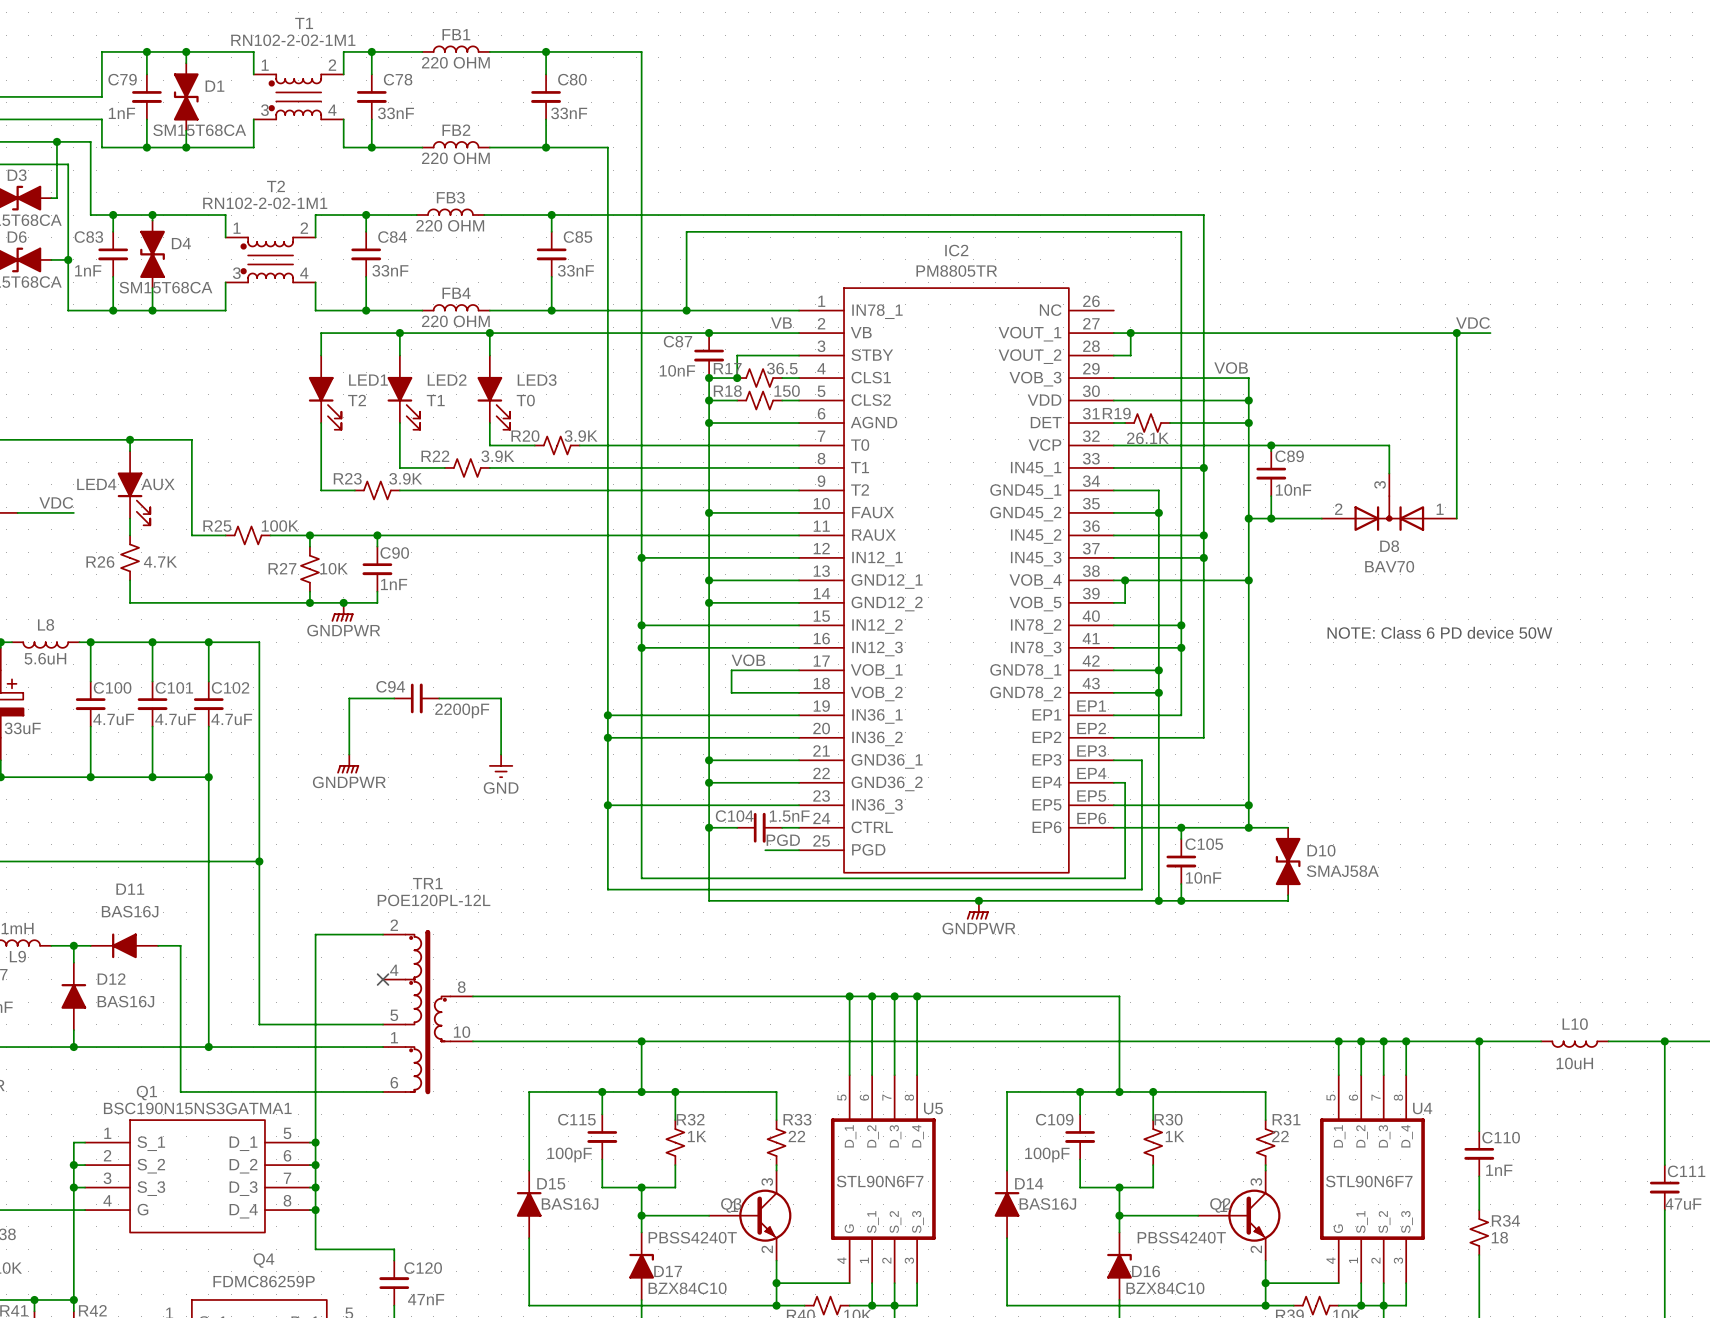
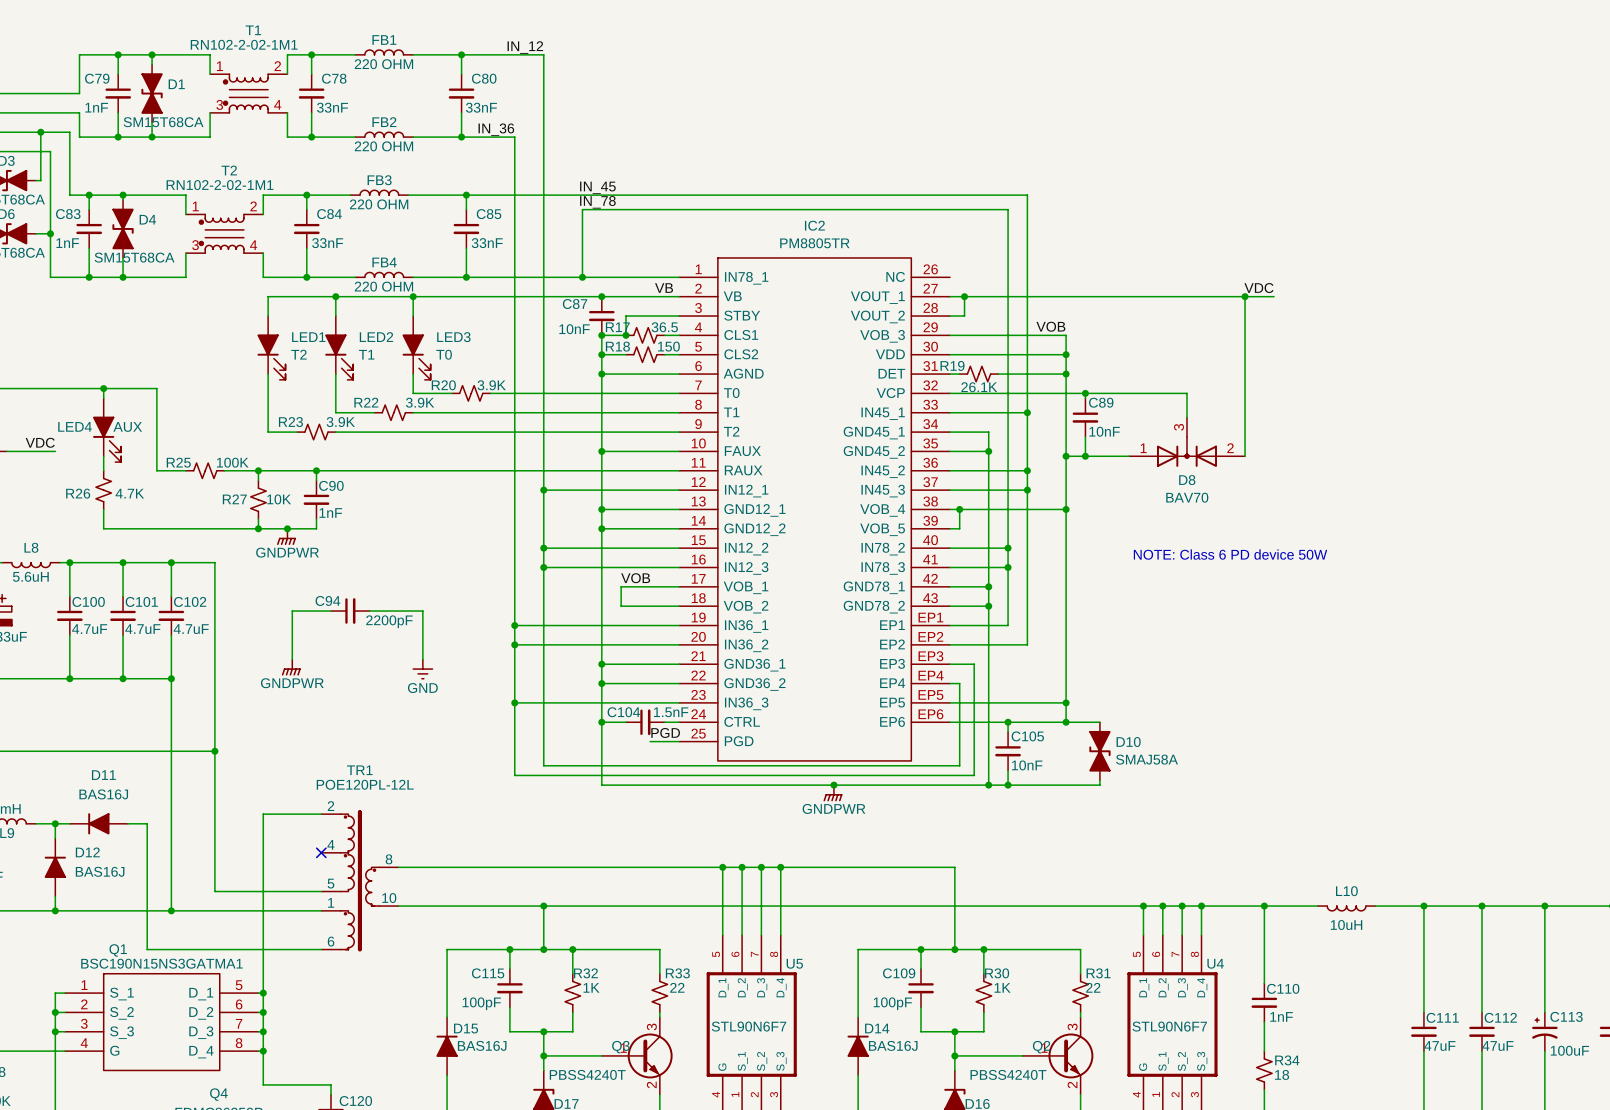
label: none -> IN_12 (525, 47)
label: none -> IN_36 (496, 129)
label: none -> IN_45 (597, 187)
label: none -> IN_78 (597, 202)
D8 flip: as is (1389, 513) -> left-right (1186, 451)

